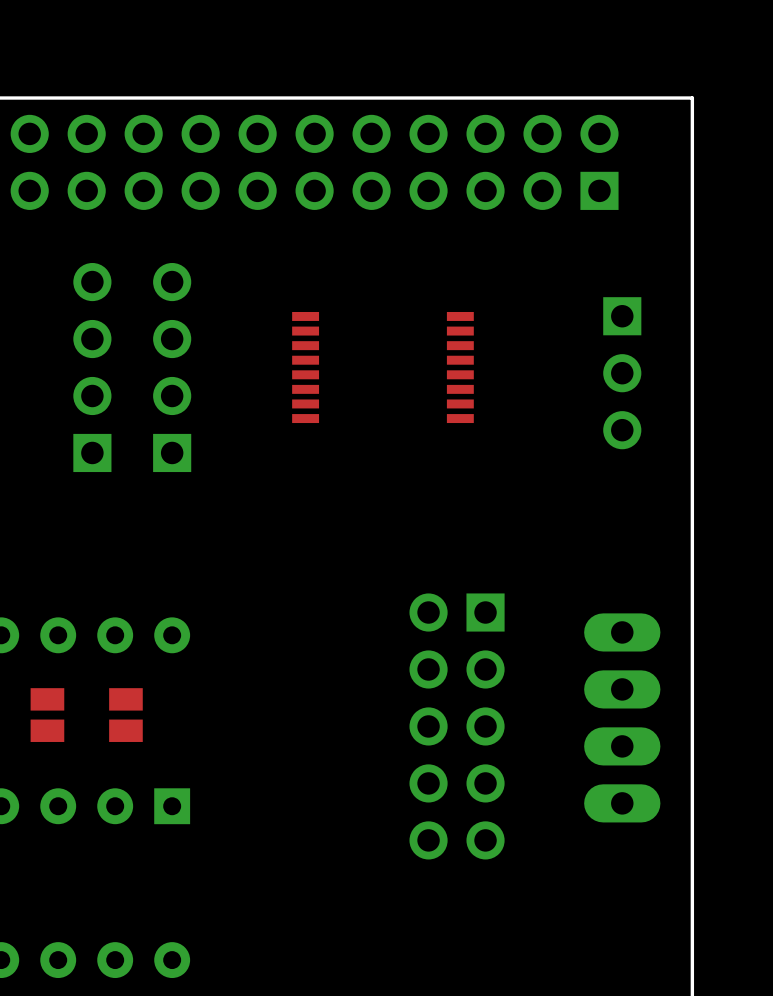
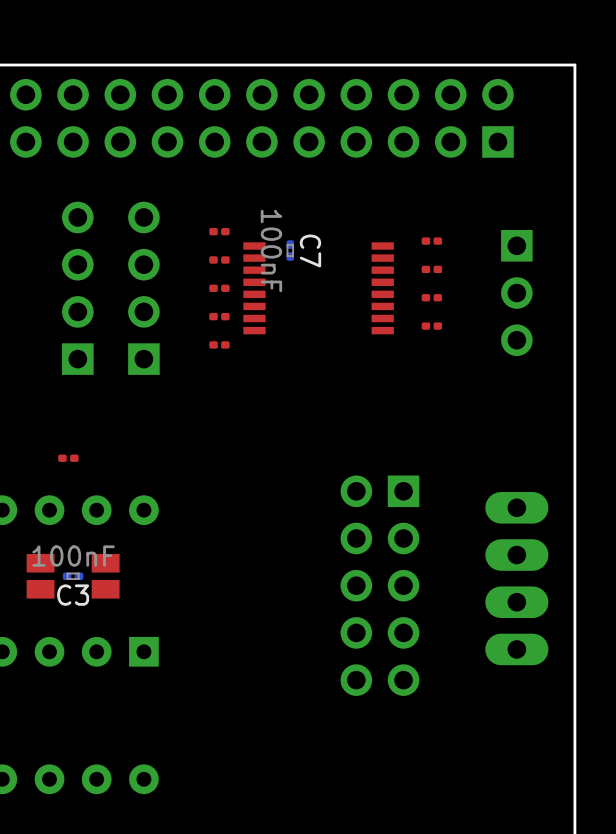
part: none -> (219, 231)
part: none -> (431, 241)
C7: none -> 100nF (290, 250)
part: none -> (219, 259)
part: none -> (431, 269)
part: none -> (219, 288)
part: none -> (431, 297)
part: none -> (219, 316)
part: none -> (431, 326)
part: none -> (219, 344)
part: none -> (68, 458)
C3: none -> 100nF (73, 576)

